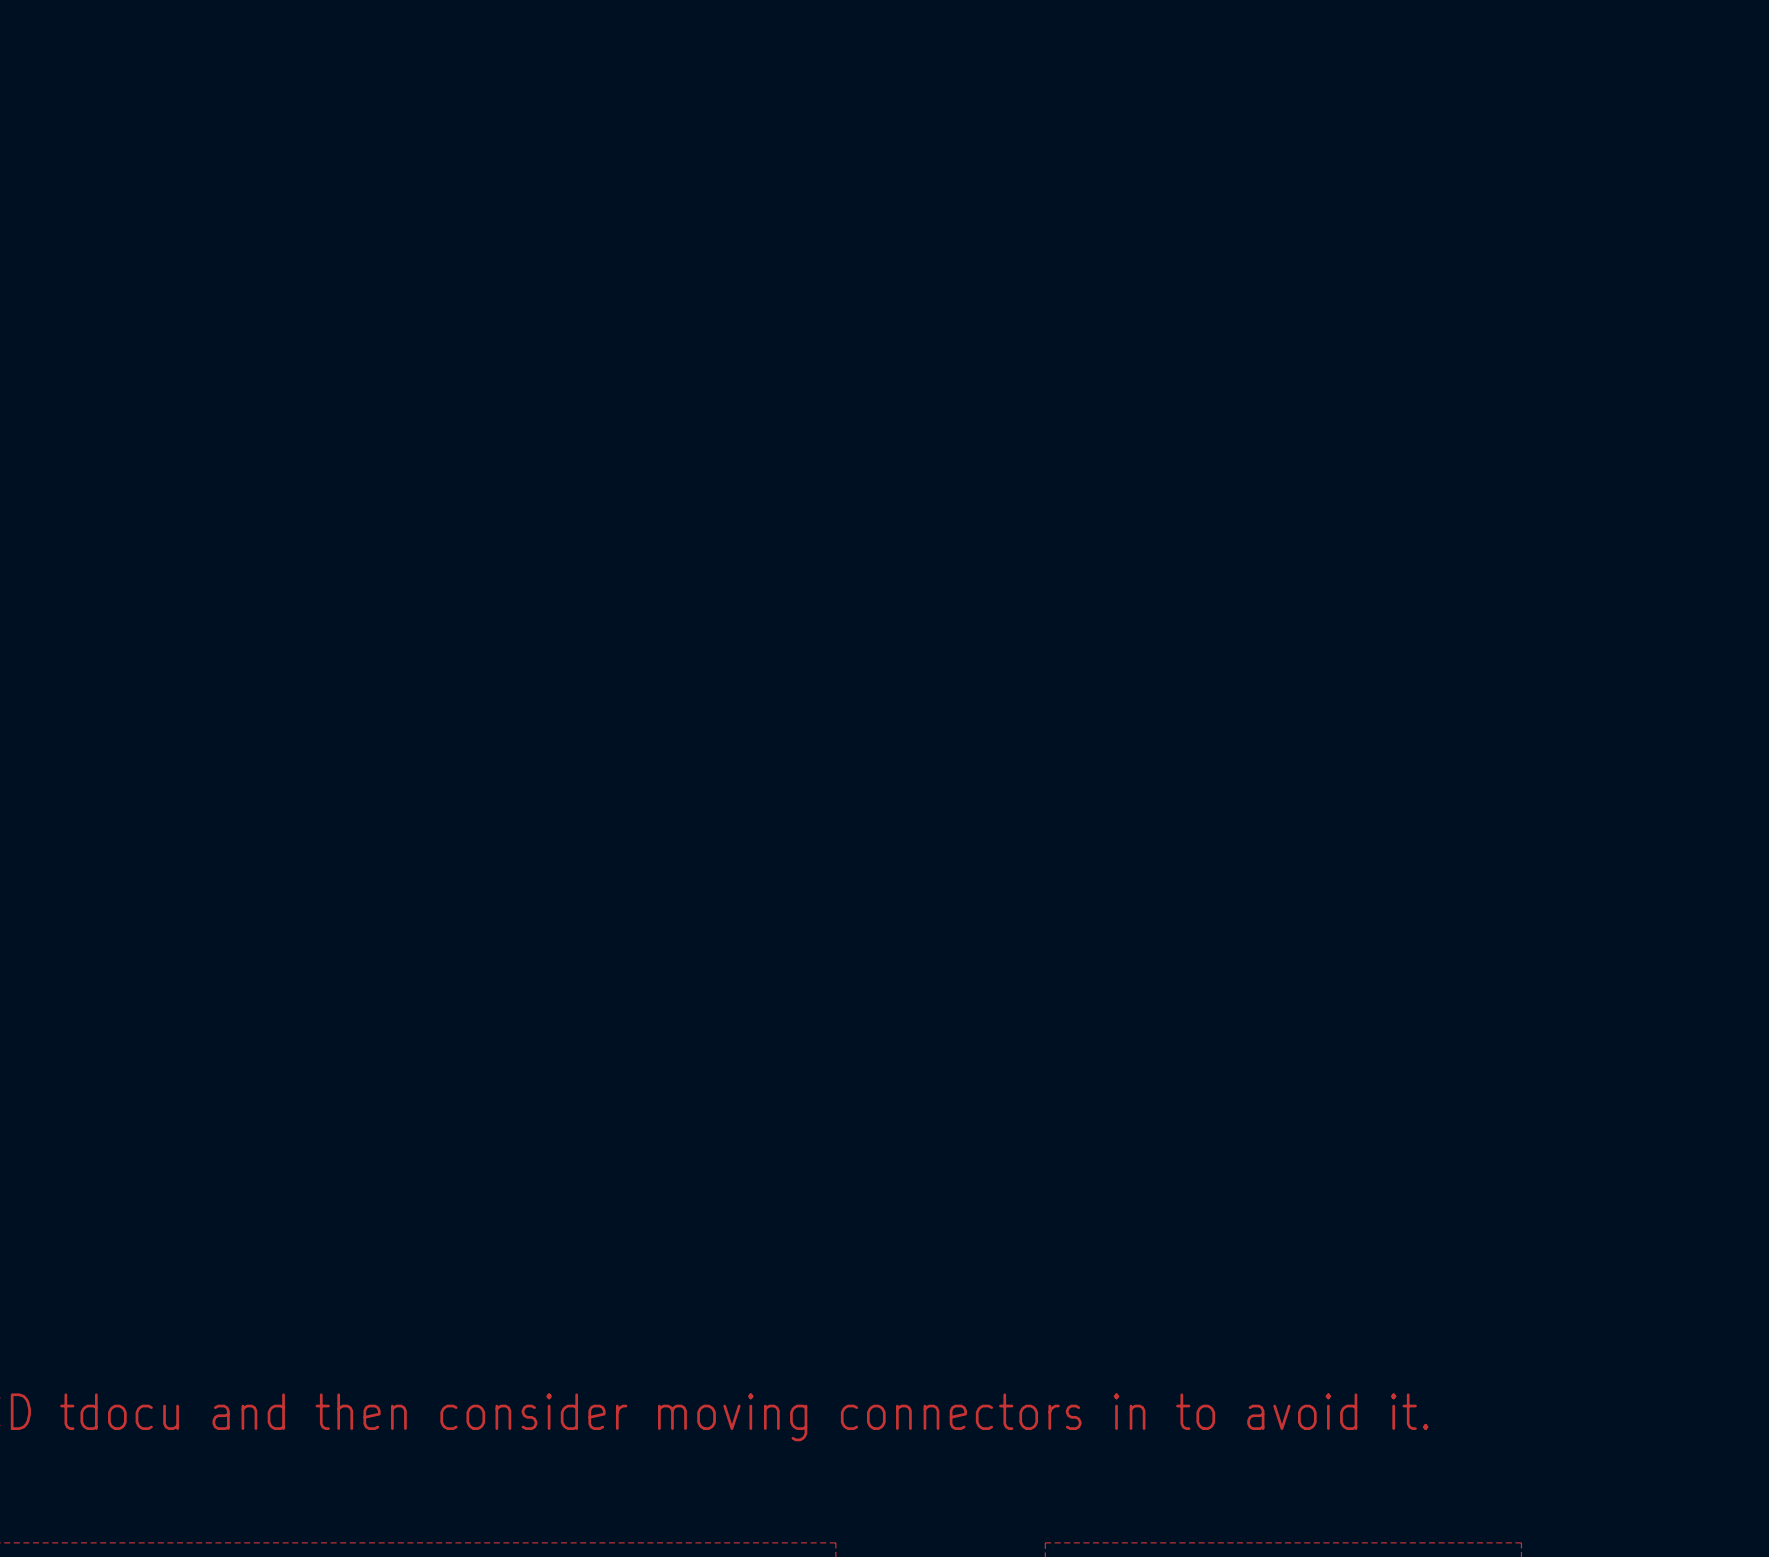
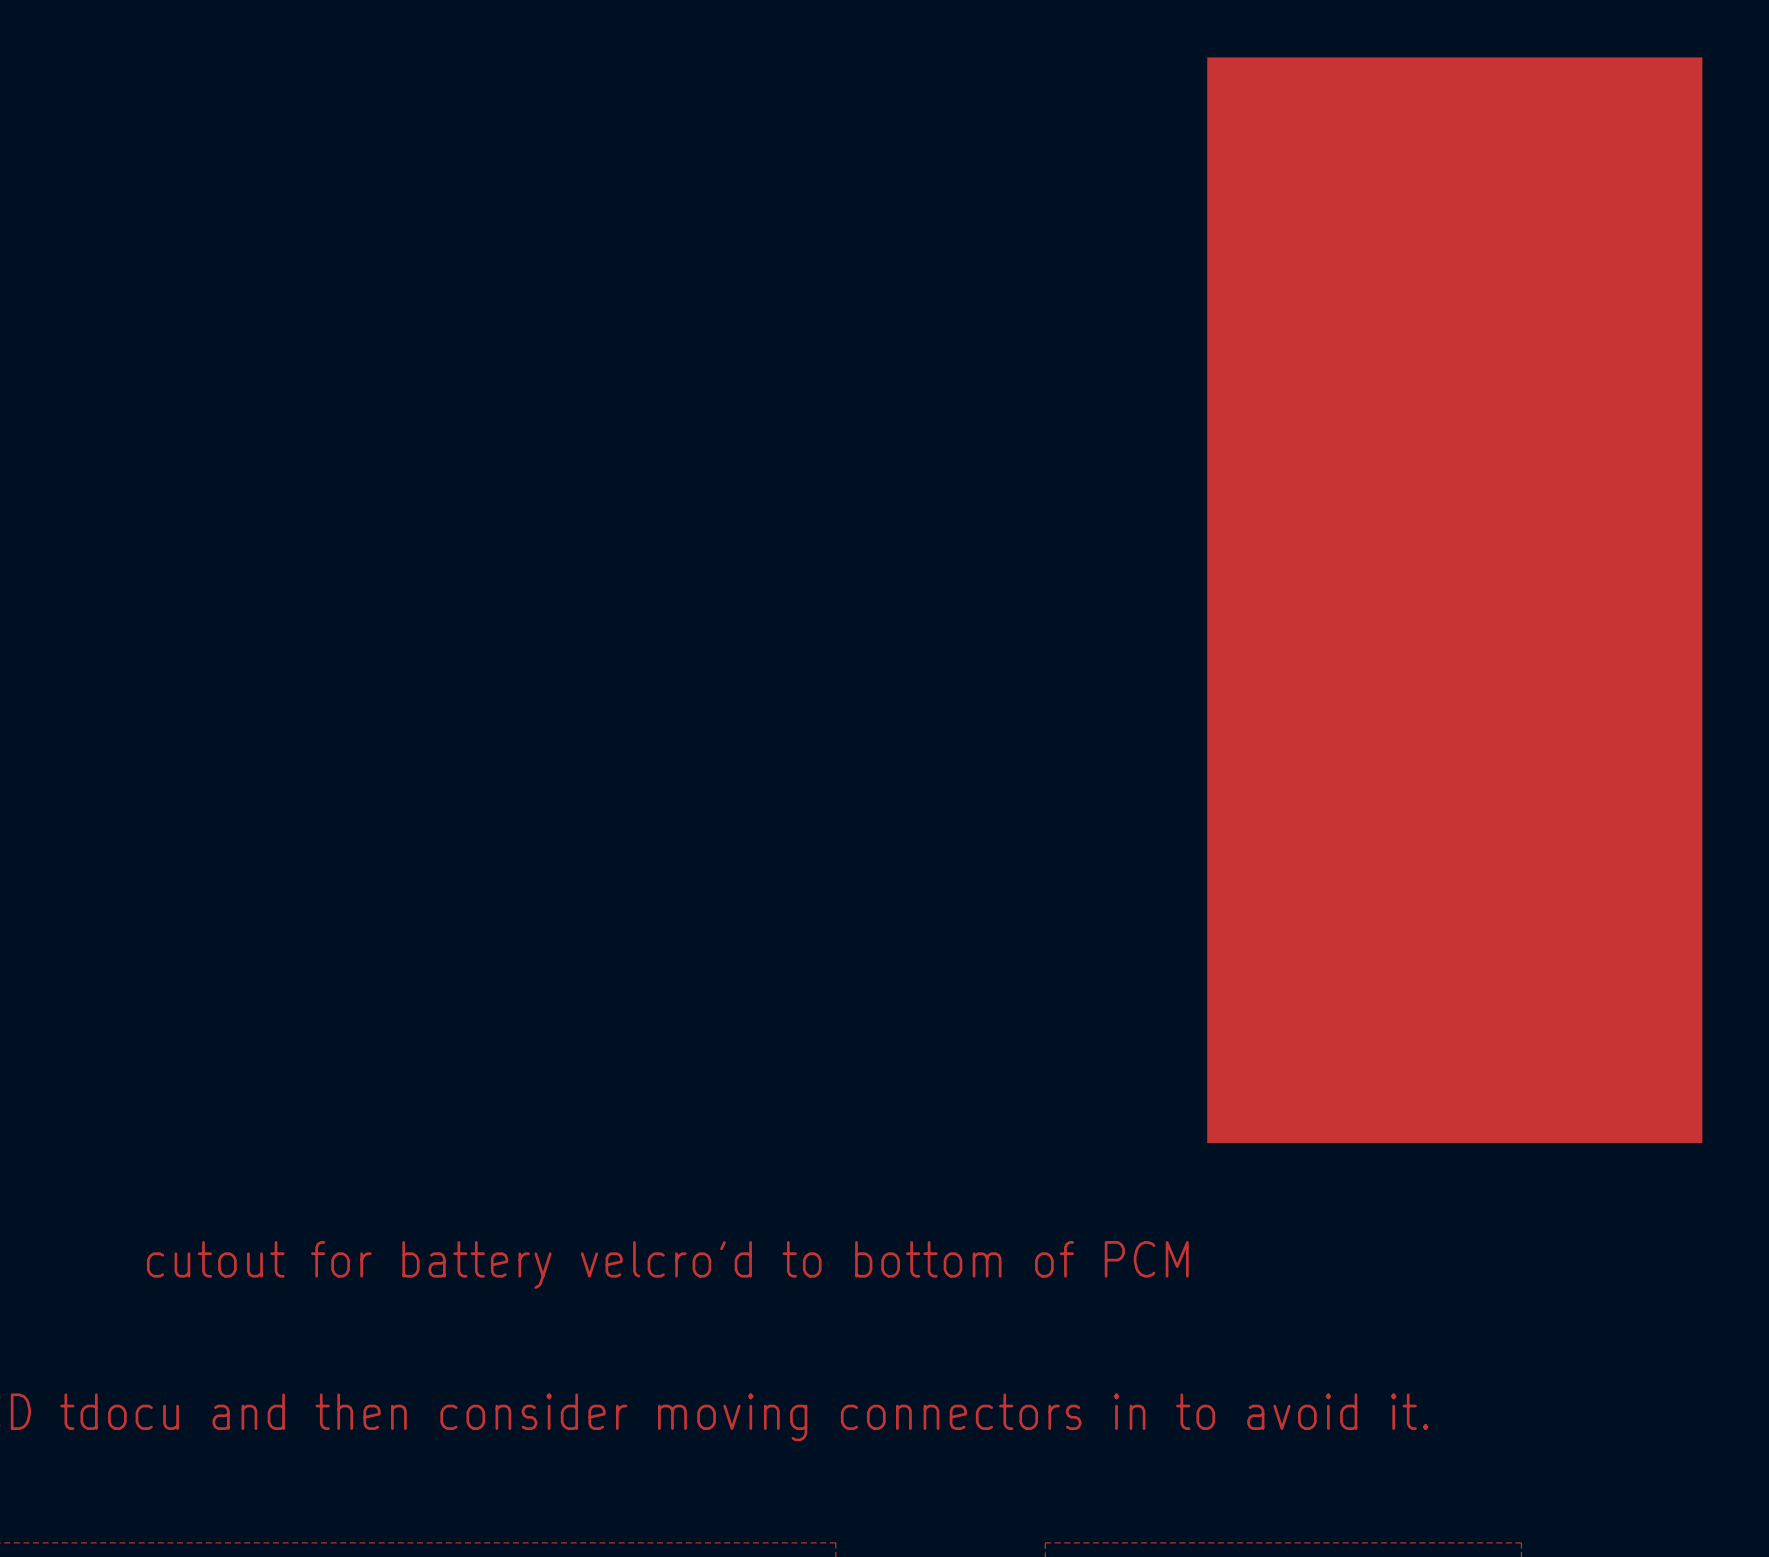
drawing: none -> [1207, 57, 1703, 1143]
text: none -> cutout for battery velcro'd to bottom of PCM (667, 1264)

